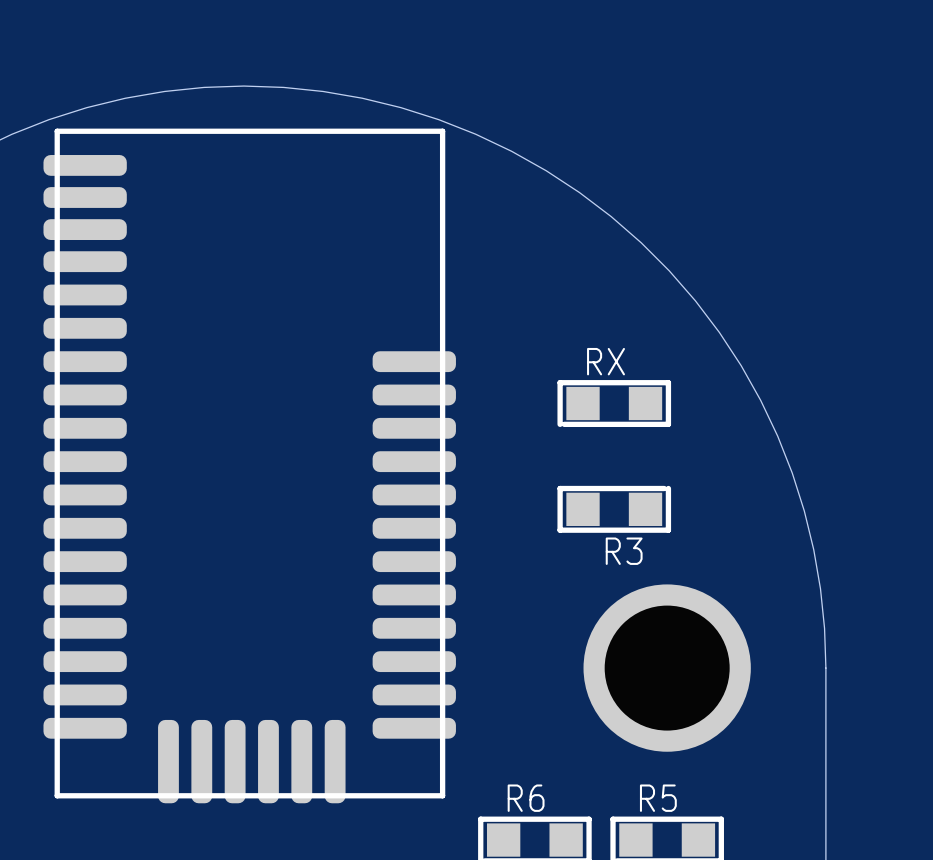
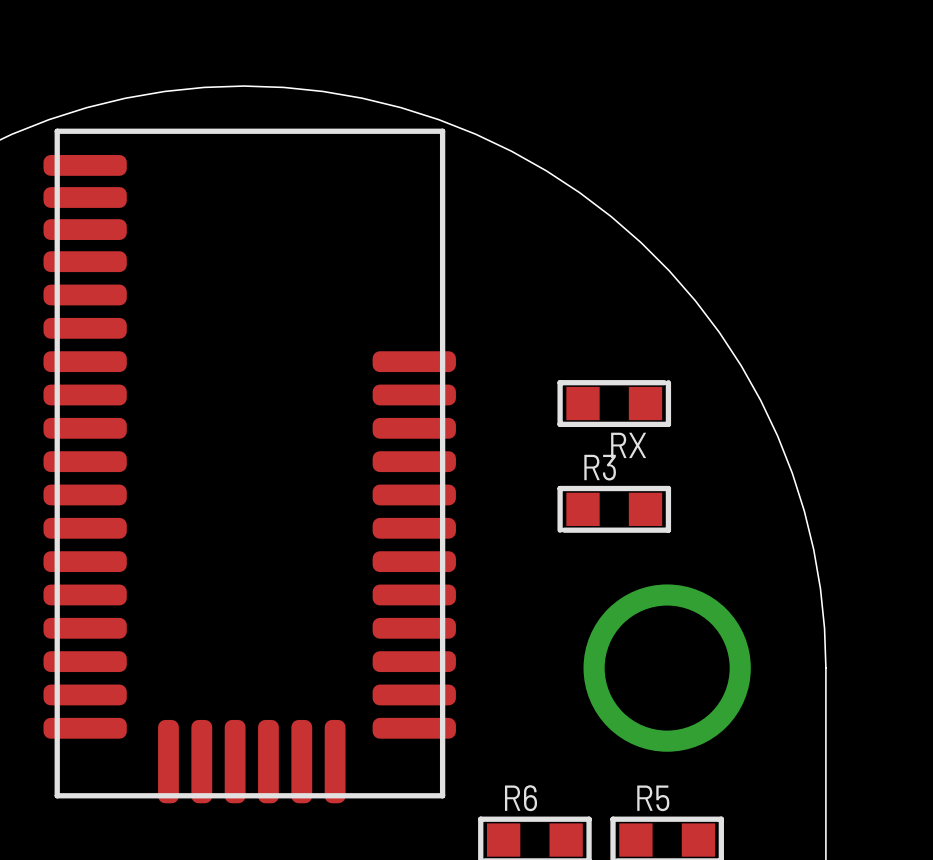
RX rotation: 0° (614, 403) -> 180° (614, 403)
R3 rotation: 0° (614, 509) -> 180° (614, 509)

